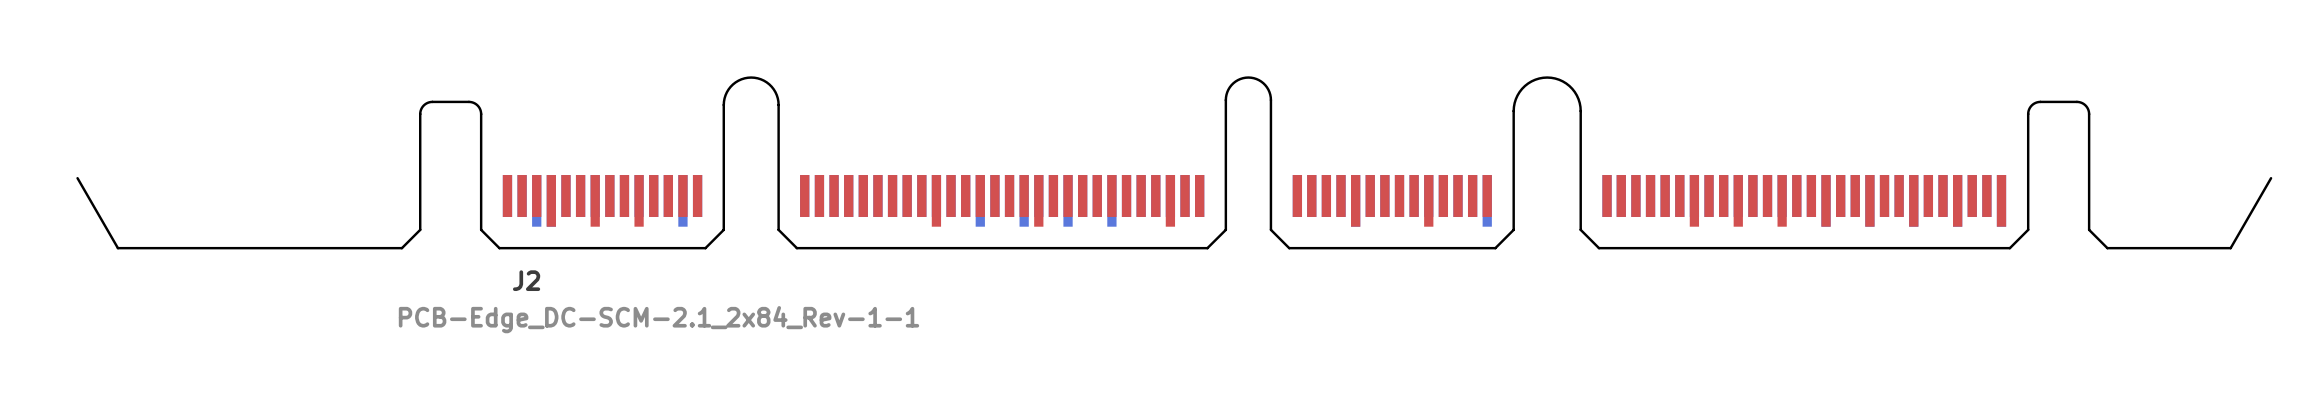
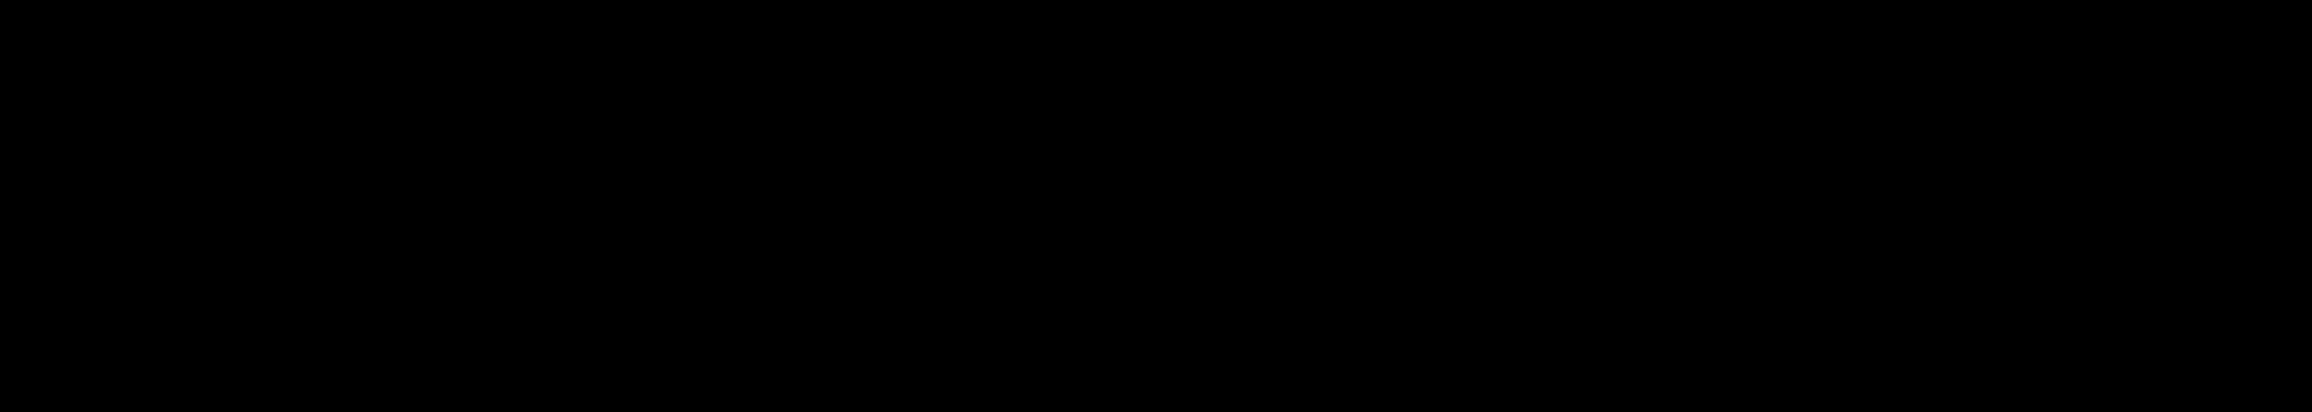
board edge: (1270, 100) (1265, 85) (1251, 77) (1235, 81) (1227, 92) (1225, 229) (1207, 248) -> none
board edge: (1270, 100) (1270, 229) (1289, 248) (1495, 248) (1513, 229) (1513, 111) (1519, 92) (1535, 79) (1547, 77) (1559, 79) (1574, 92) (1580, 111) -> none
board edge: (1580, 111) (1580, 229) (1598, 248) (2009, 248) (2028, 229) (2028, 112) (2031, 105) (2038, 102) (2078, 101) (2084, 104) (2087, 108) (2089, 229) (2107, 248) (2230, 248) (2271, 178) -> none
board edge: (77, 178) (117, 248) (401, 248) (420, 229) (421, 109) (424, 104) (430, 102) (470, 102) (477, 105) (481, 112) (481, 229) (499, 248) (705, 248) (723, 229) (724, 98) (728, 89) (735, 82) (744, 78) (754, 77) (769, 84) (777, 98) (778, 229) (796, 248) (1207, 248) -> none
J2: PCB-Edge_DC-SCM-2.1_2x84_Rev-1-1 (1254, 200) -> none

